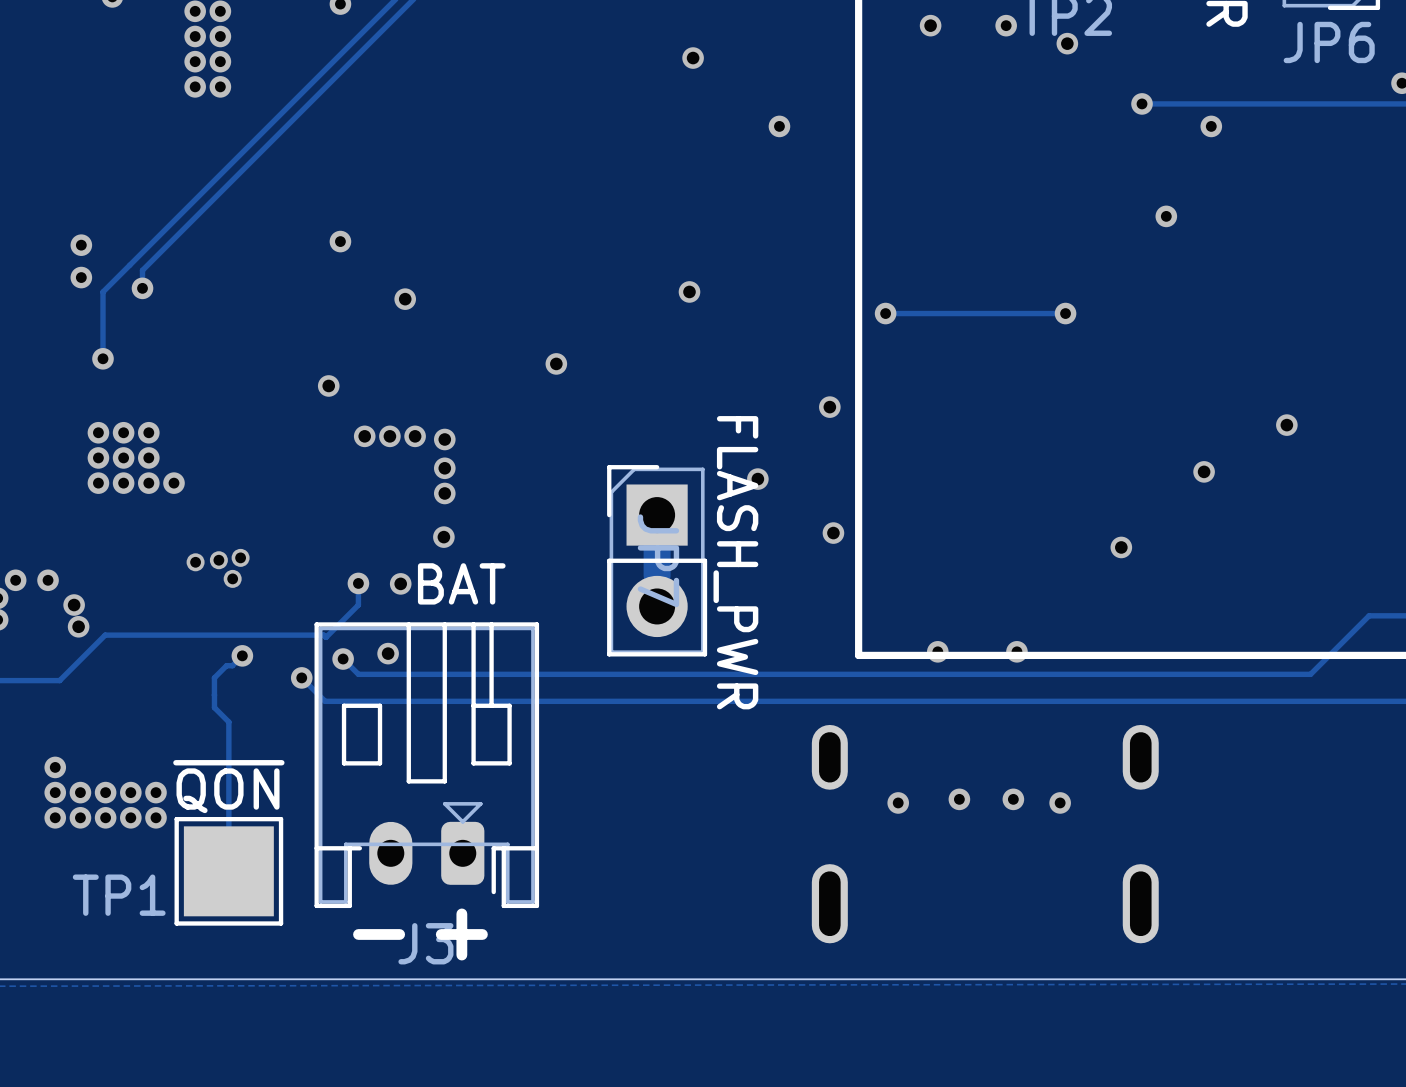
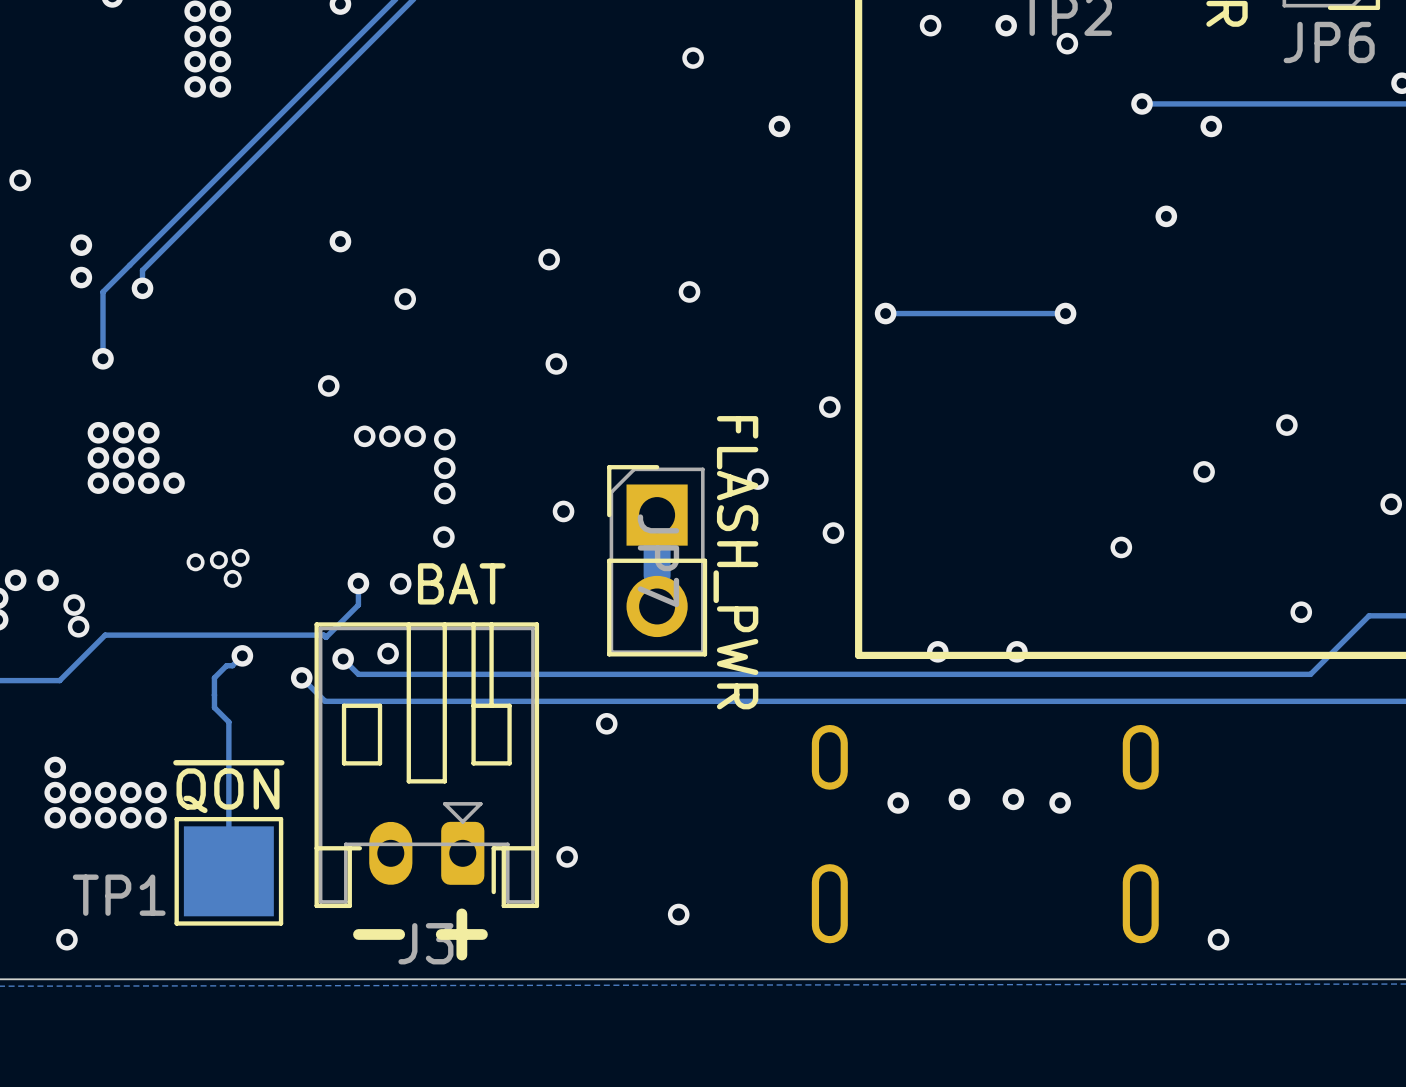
via: none -> (20, 180)
via: none -> (549, 259)
via: none -> (1391, 504)
via: none -> (563, 511)
via: none -> (1301, 612)
via: none -> (606, 723)
via: none -> (567, 856)
via: none -> (678, 914)
via: none -> (66, 939)
via: none -> (1218, 939)

